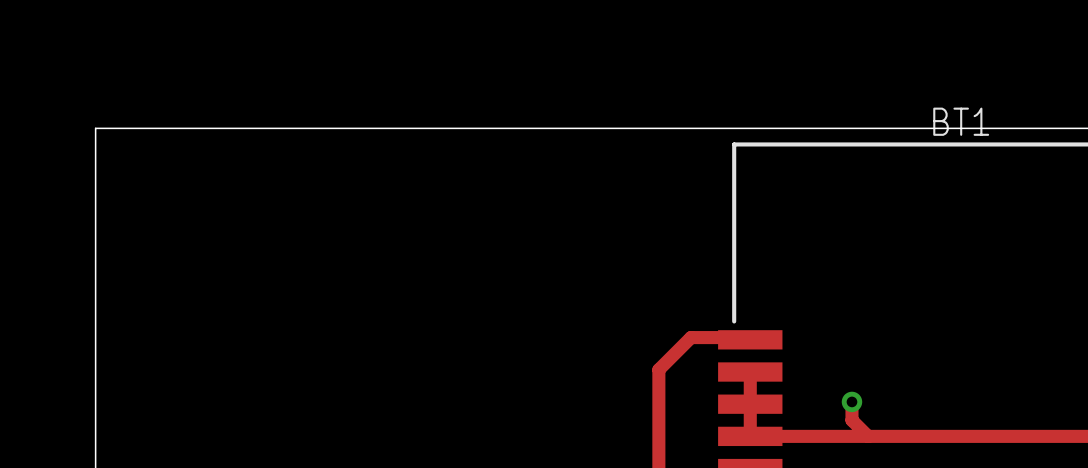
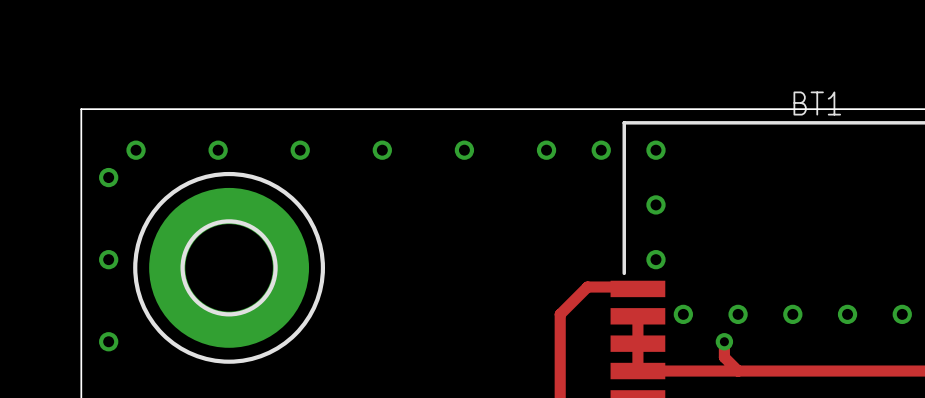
via: none -> (136, 150)
via: none -> (218, 150)
via: none -> (300, 150)
via: none -> (382, 150)
via: none -> (464, 150)
via: none -> (546, 150)
via: none -> (601, 150)
via: none -> (655, 150)
via: none -> (108, 177)
via: none -> (655, 204)
via: none -> (108, 259)
via: none -> (655, 259)
part: none -> (229, 267)
via: none -> (683, 314)
via: none -> (738, 314)
via: none -> (792, 314)
via: none -> (847, 314)
via: none -> (902, 314)
via: none -> (108, 341)

